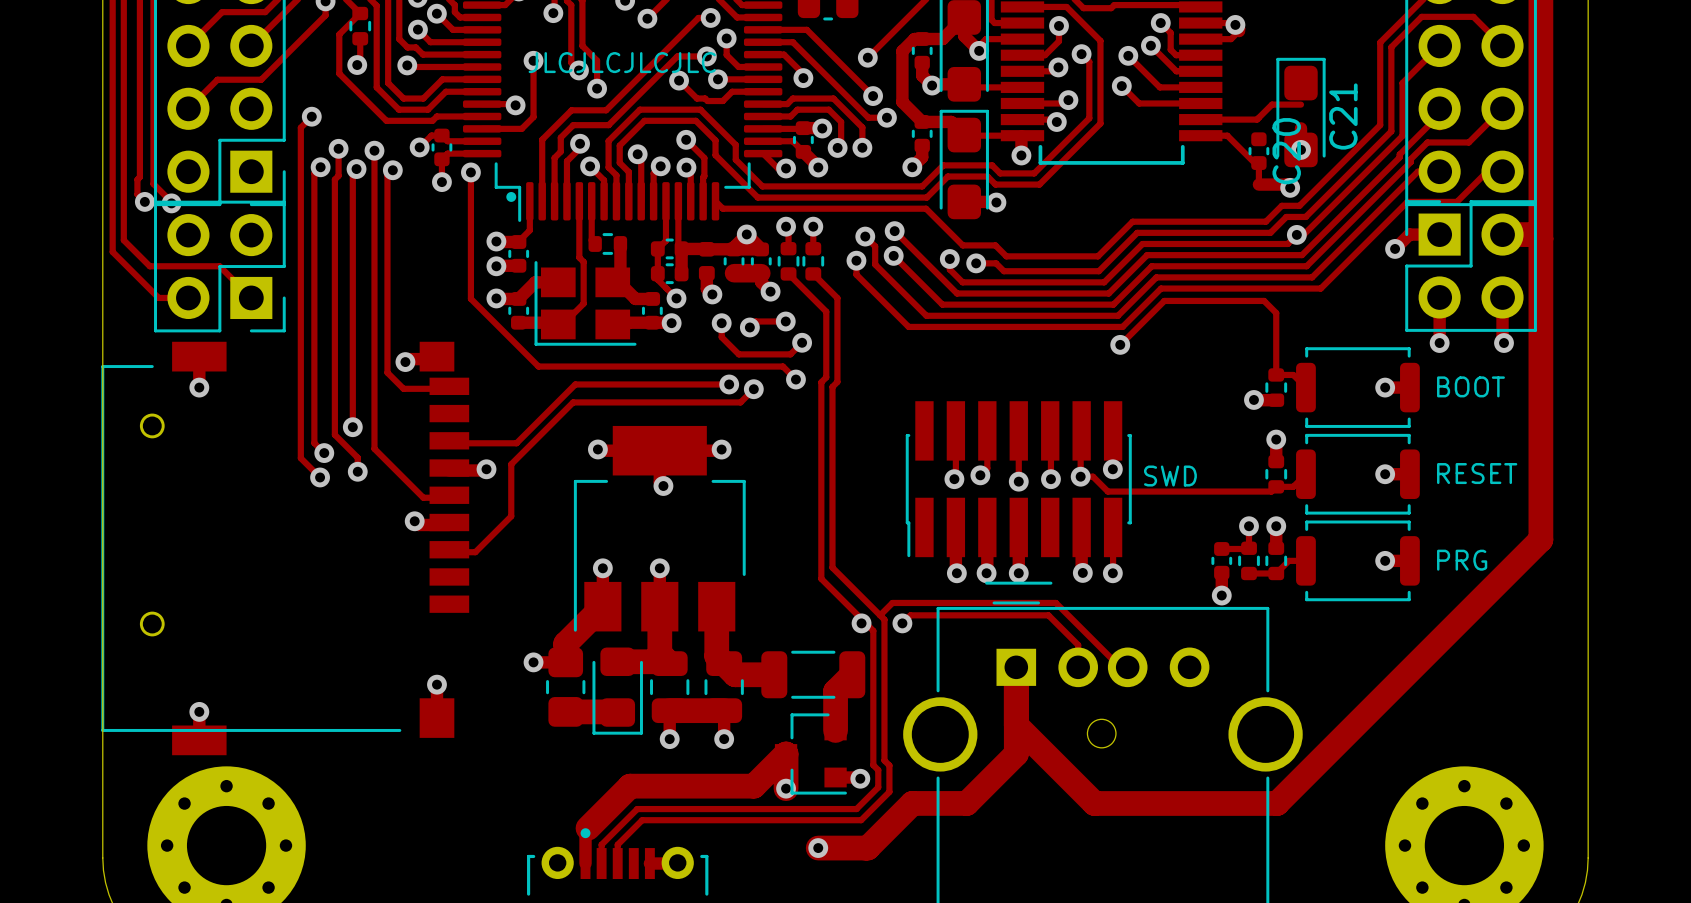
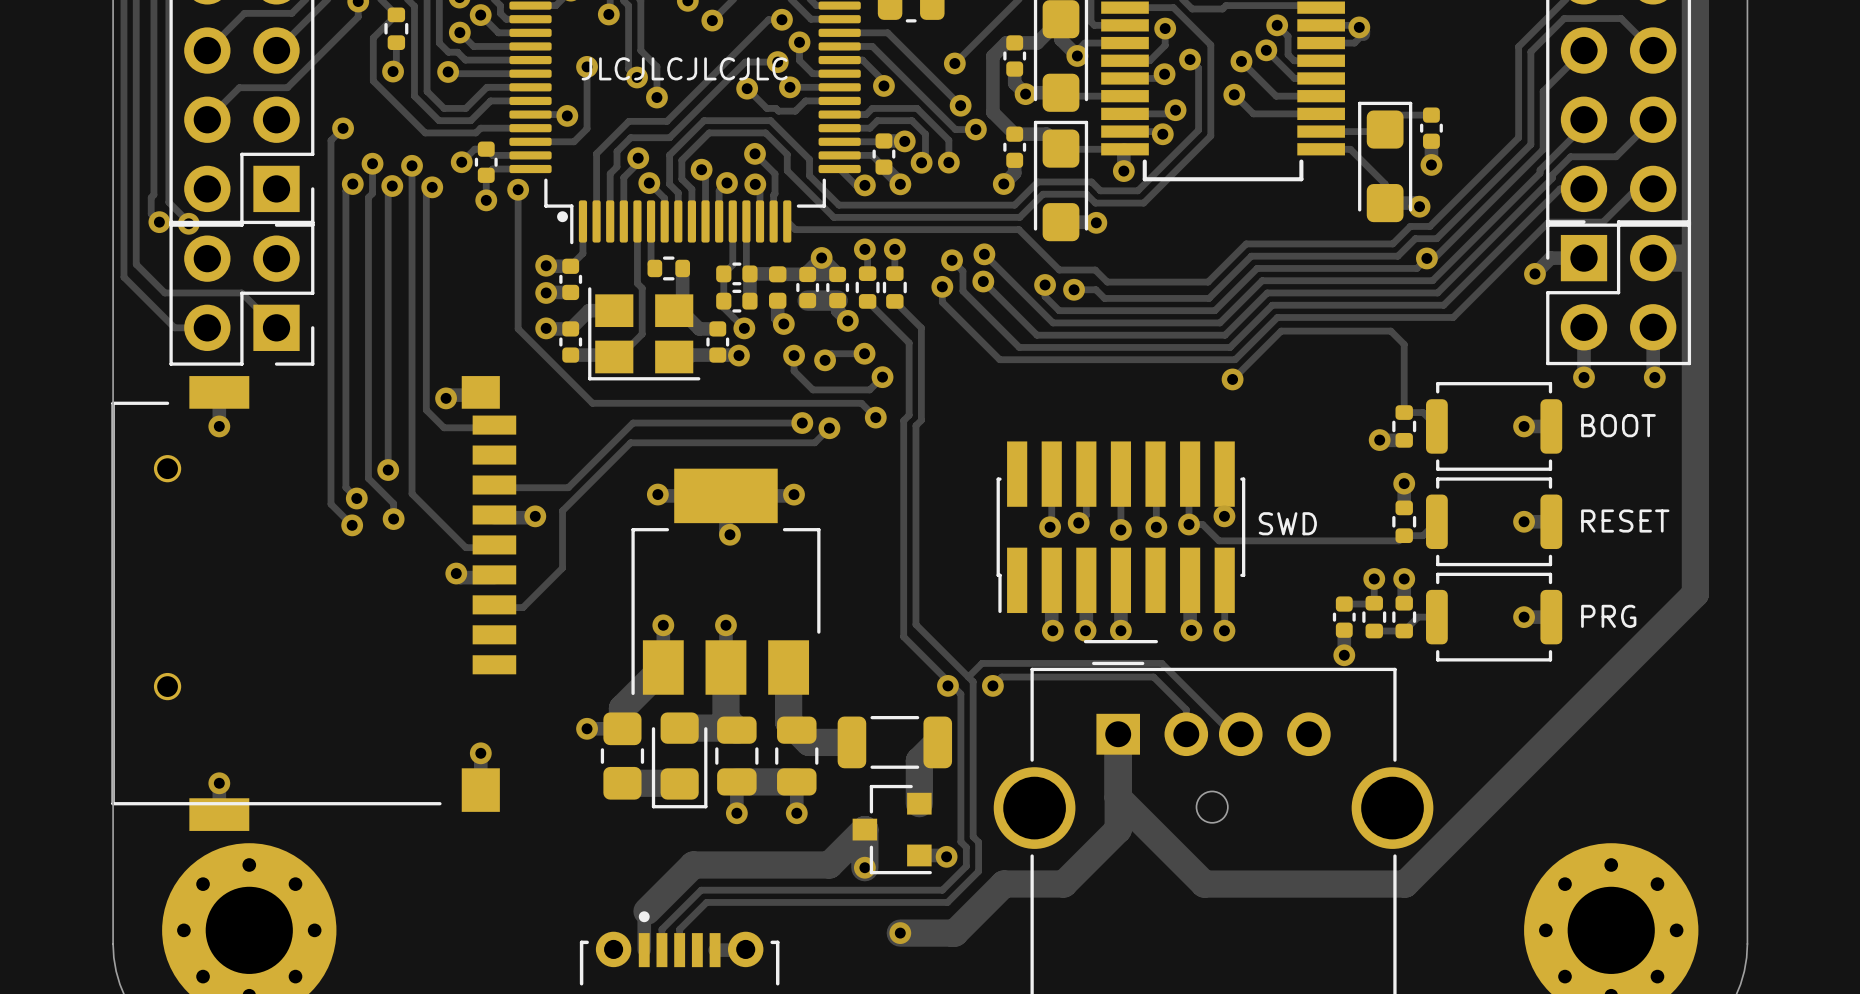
C21: (1301, 112) -> none
part: none -> (1431, 128)
part: none -> (1385, 161)
C20: (1258, 151) -> none

